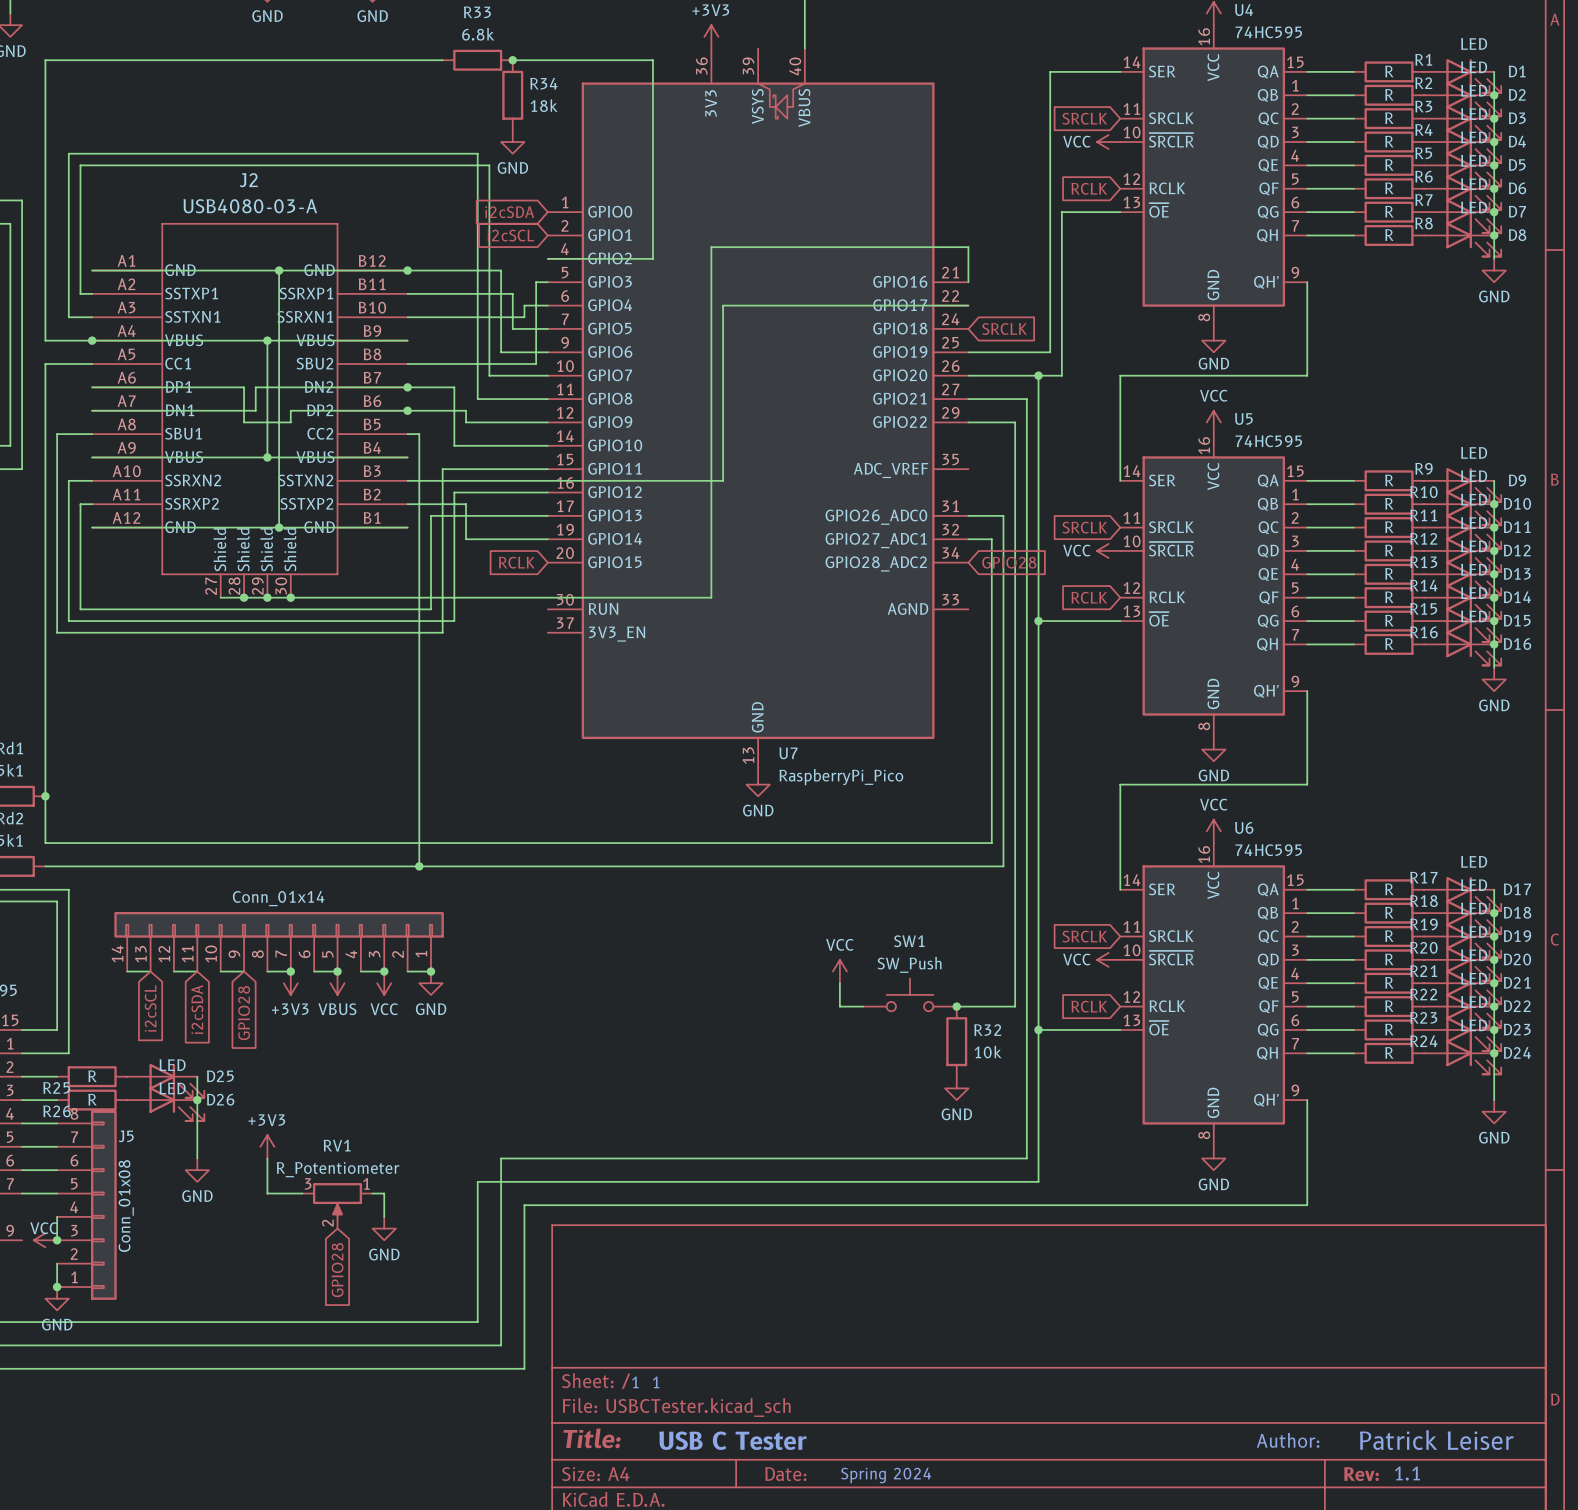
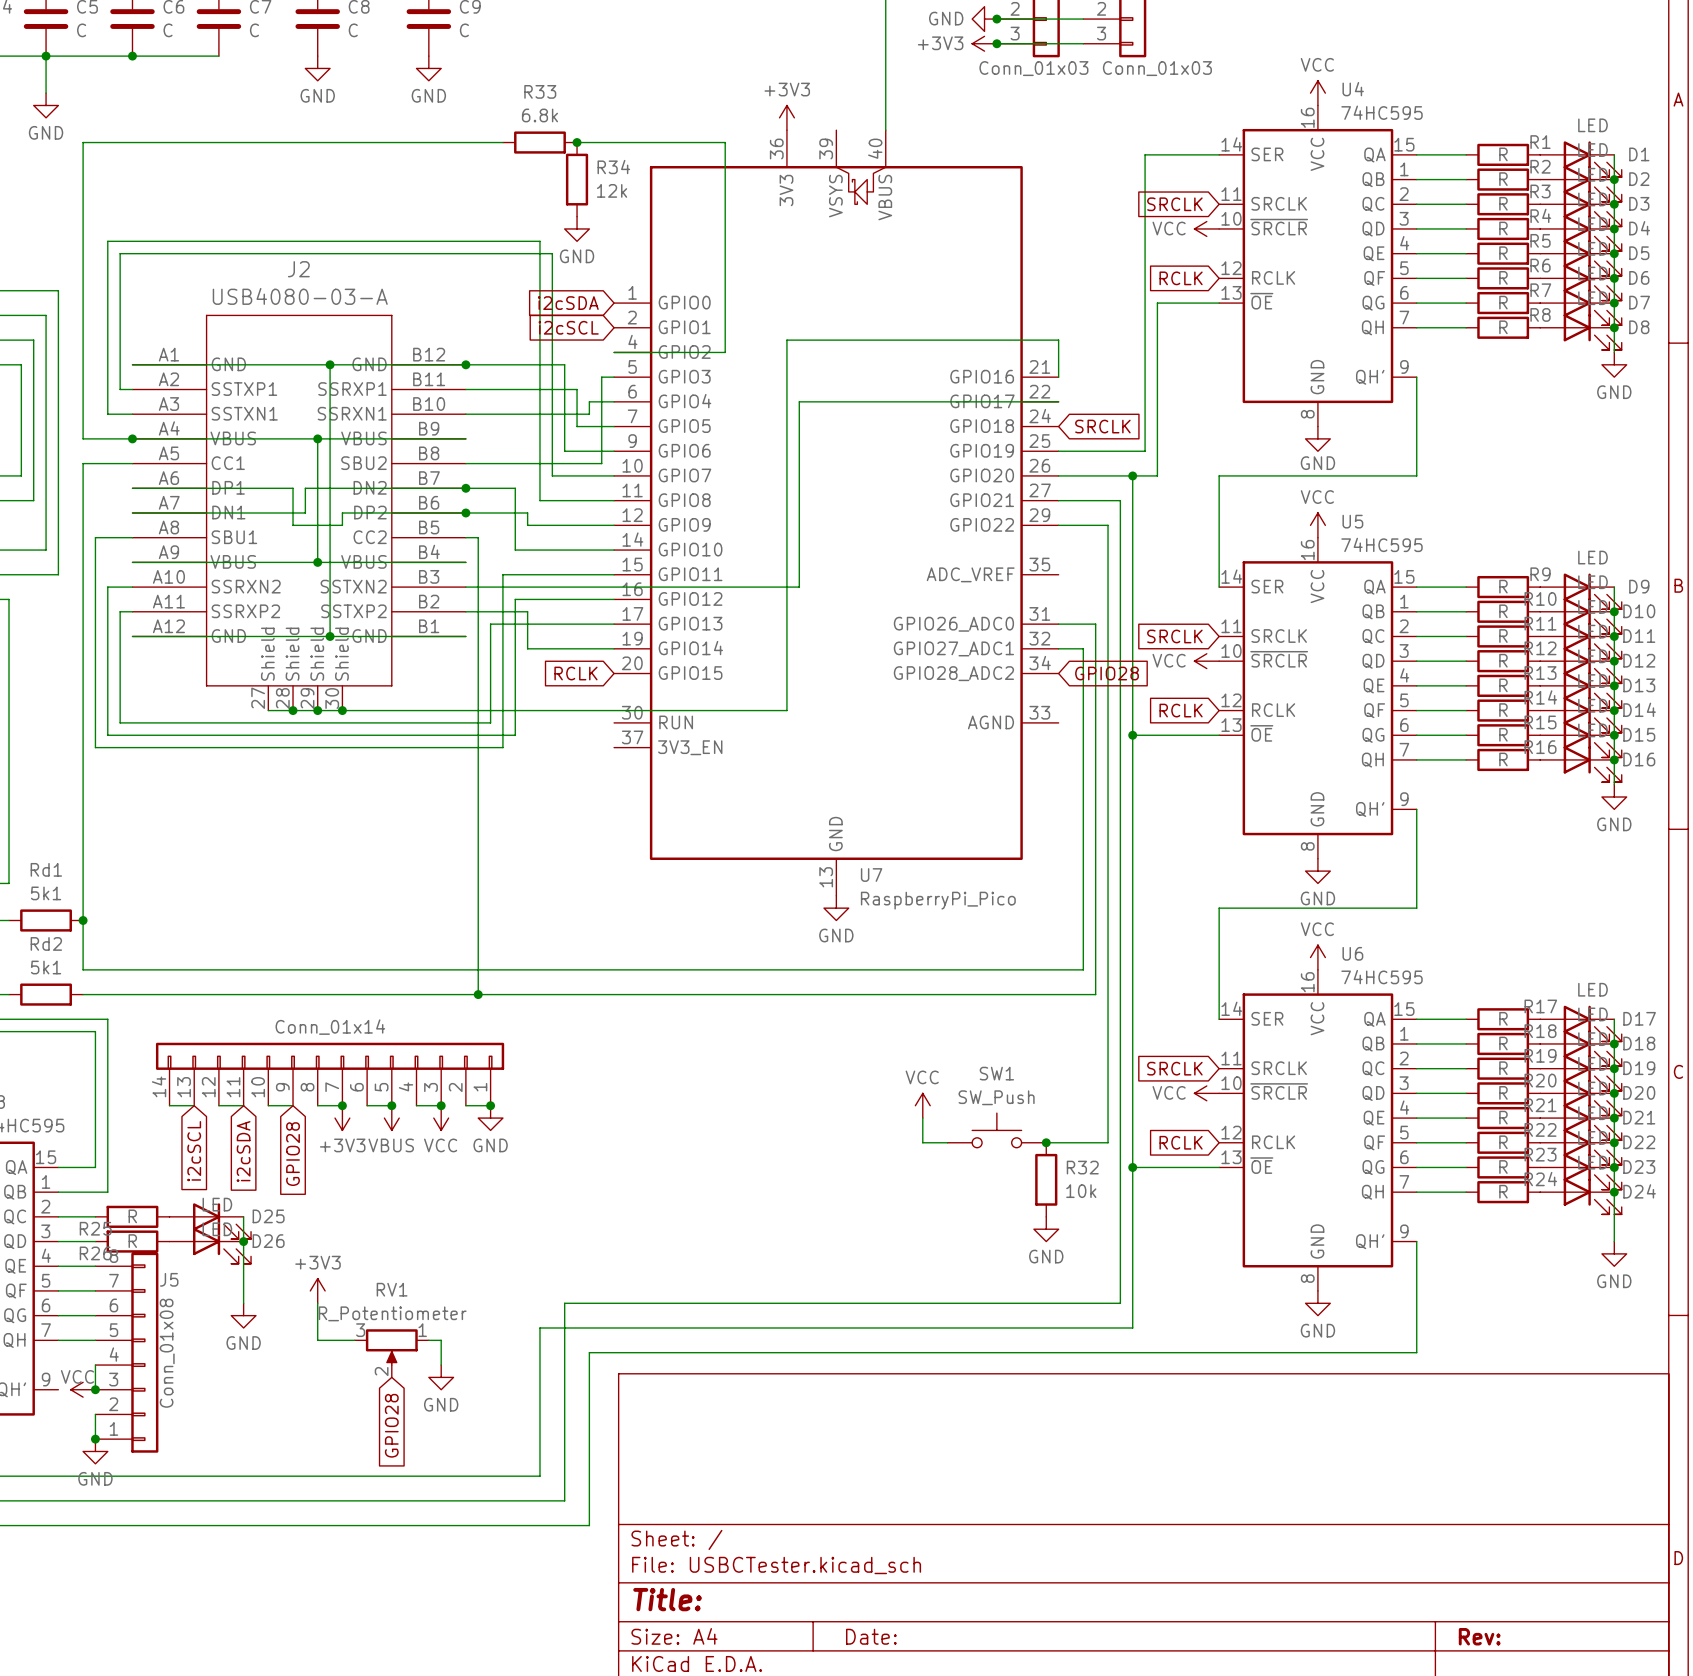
R34 value: 18k (544, 105) -> 12k (612, 190)
text: 1 1 (645, 1382) -> none
text: USB C Tester (732, 1440) -> none
text: Author: (1288, 1440) -> none
text: Patrick Leiser (1436, 1440) -> none
text: 1.1 (1407, 1473) -> none
text: Spring 2024 (886, 1475) -> none

